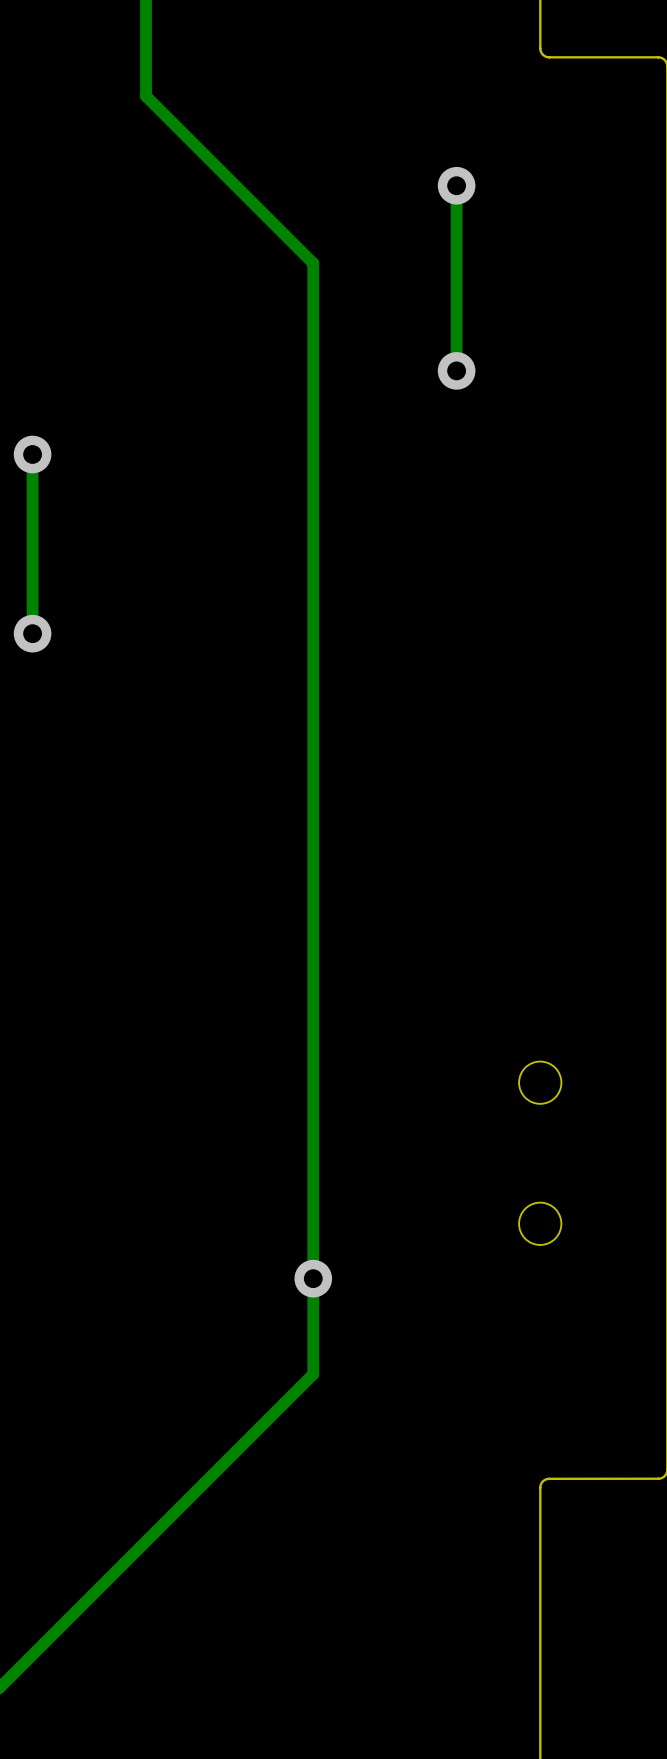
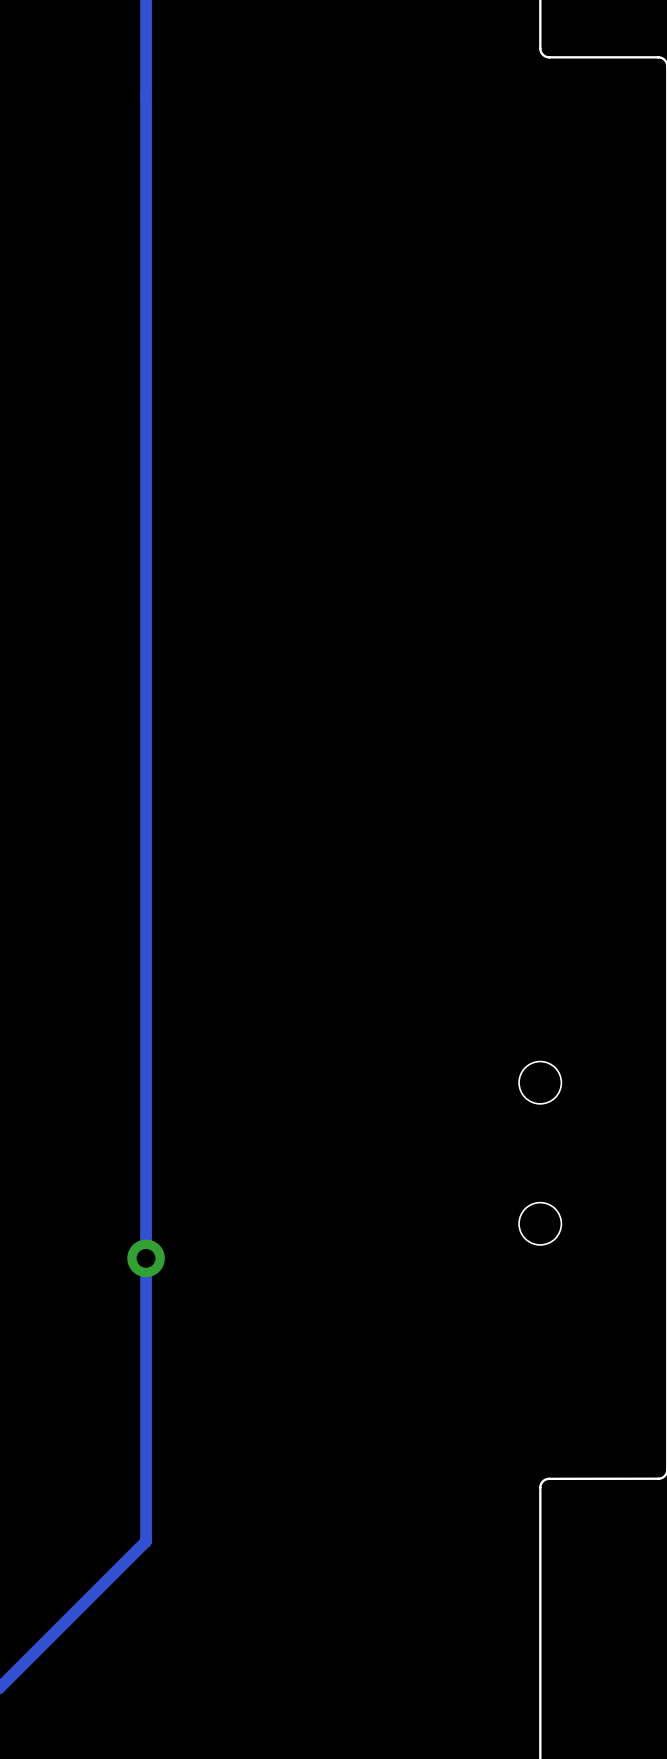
track: (146, 96) (313, 263) (313, 1374) (146, 1541) -> (146, 96) (146, 1541)
track: (456, 185) (456, 370) -> none
via: (456, 185) -> none
via: (456, 370) -> none
track: (32, 454) (32, 633) -> none
via: (32, 454) -> none
via: (32, 633) -> none
via position: (313, 1278) -> (146, 1258)

